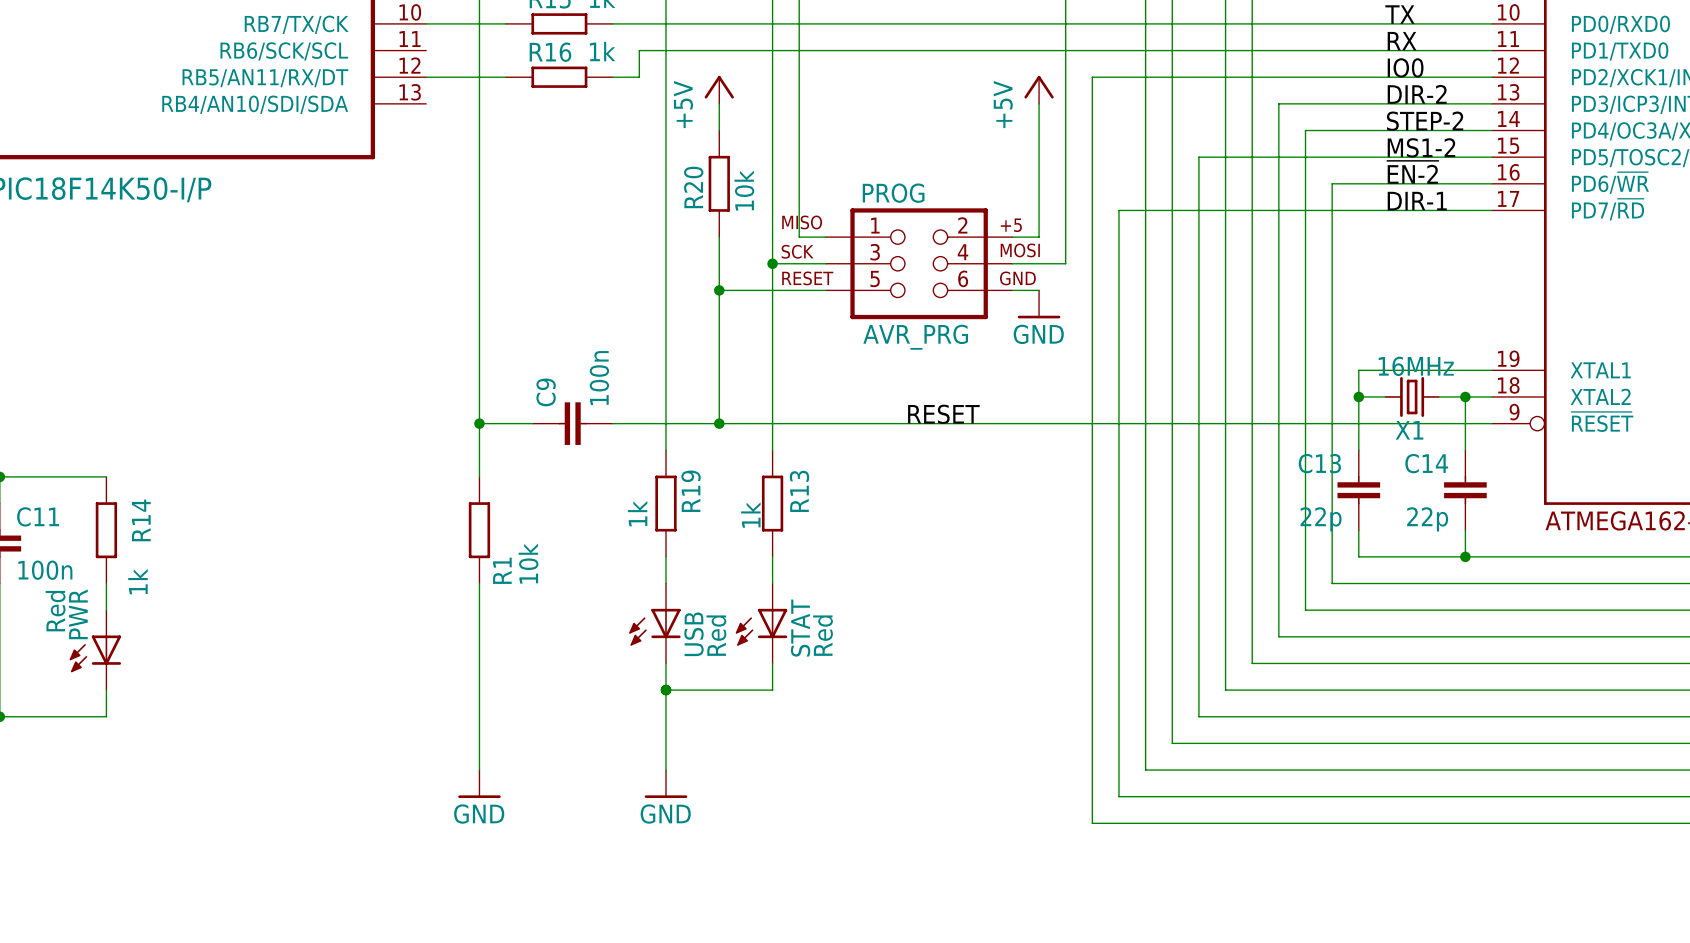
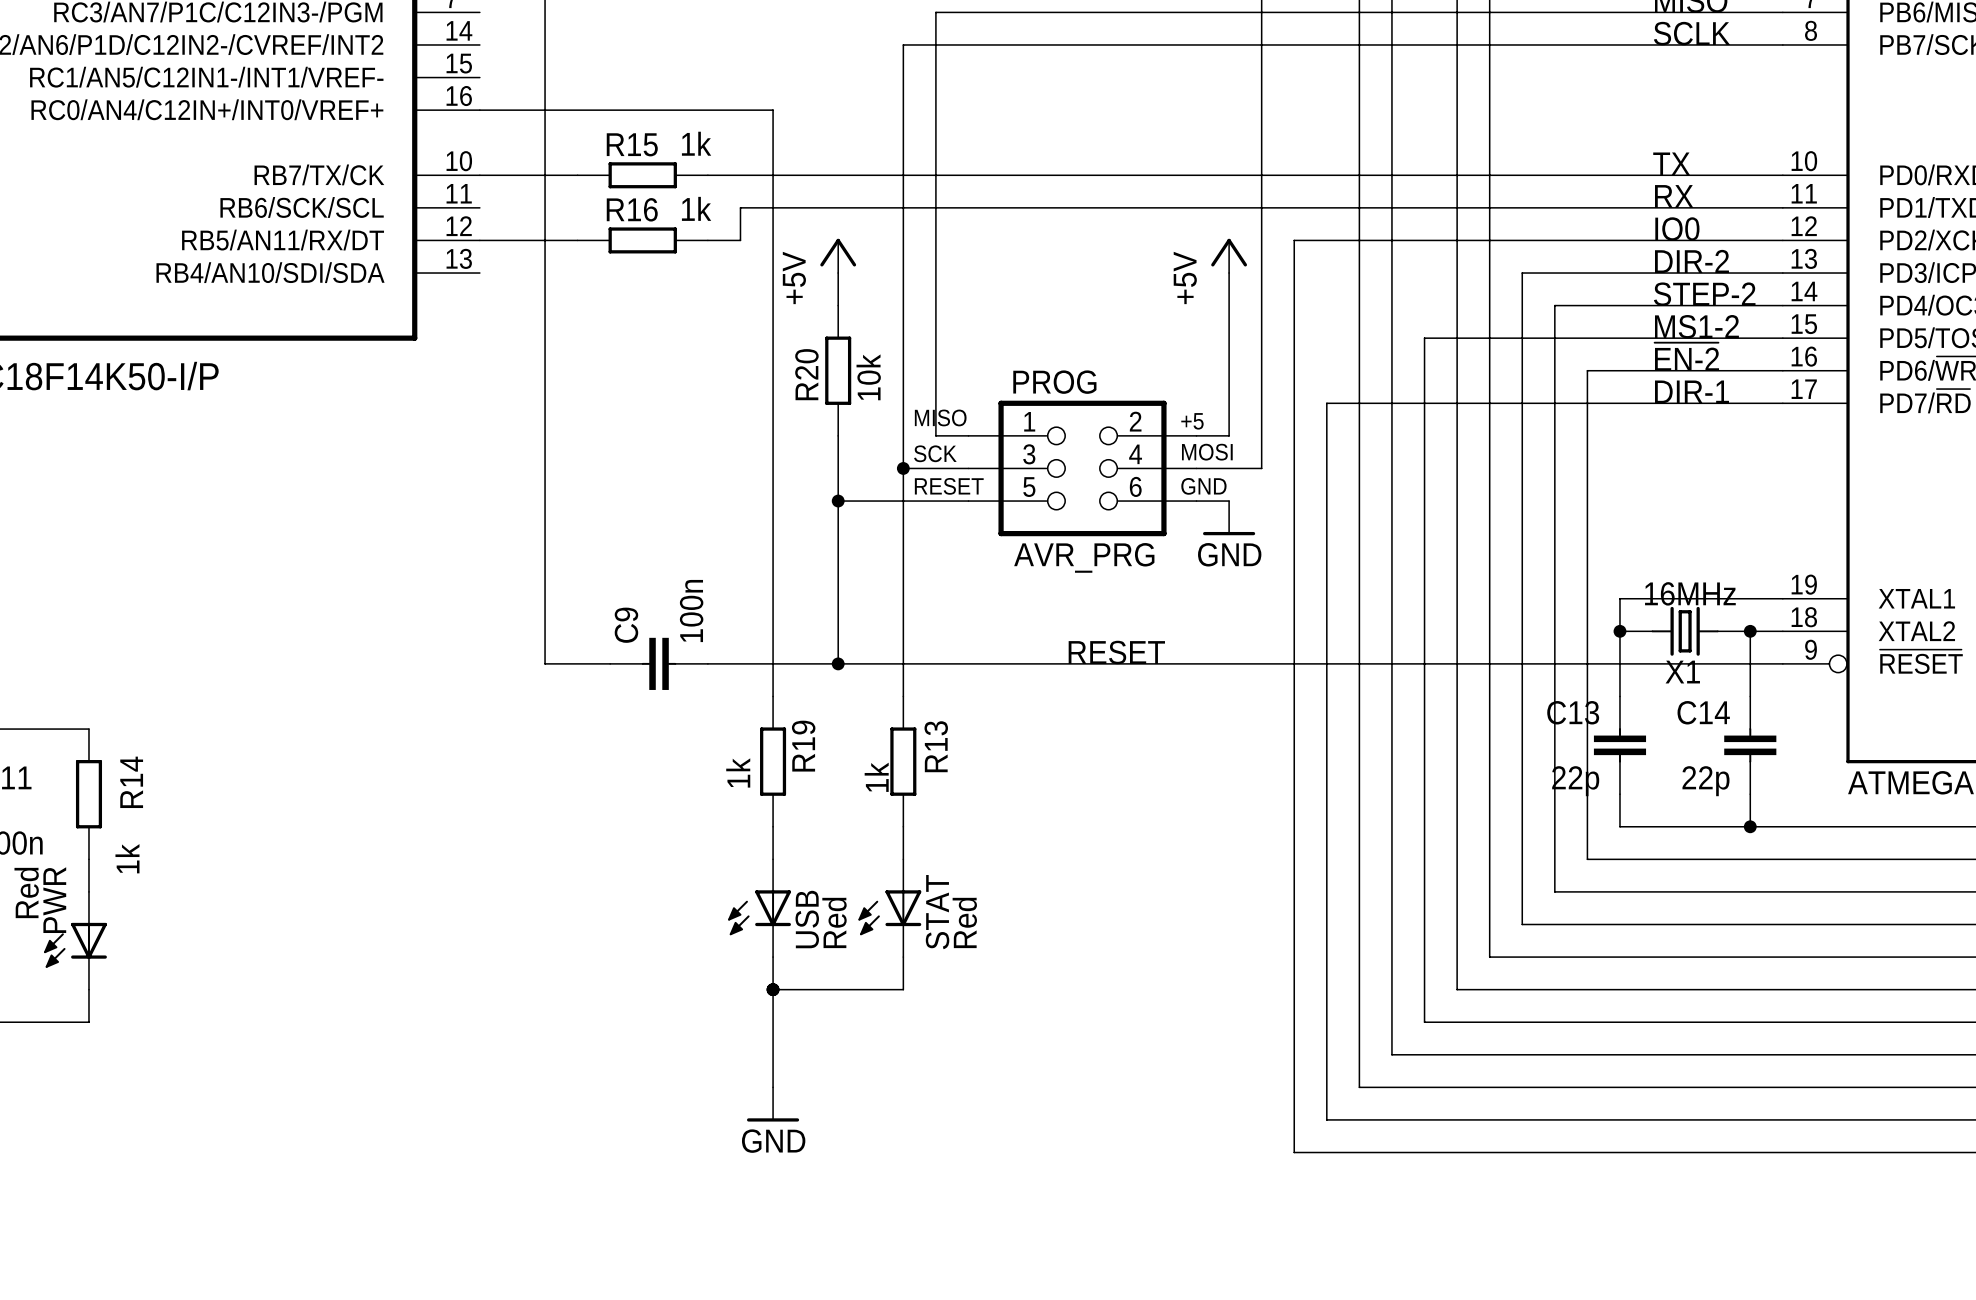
wire: (479, 423) (479, 476) -> none
junction: (479, 423) -> none
R1: 10k (479, 530) -> none
wire: (479, 583) (479, 770) -> none
power symbol: GND (479, 784) -> none

